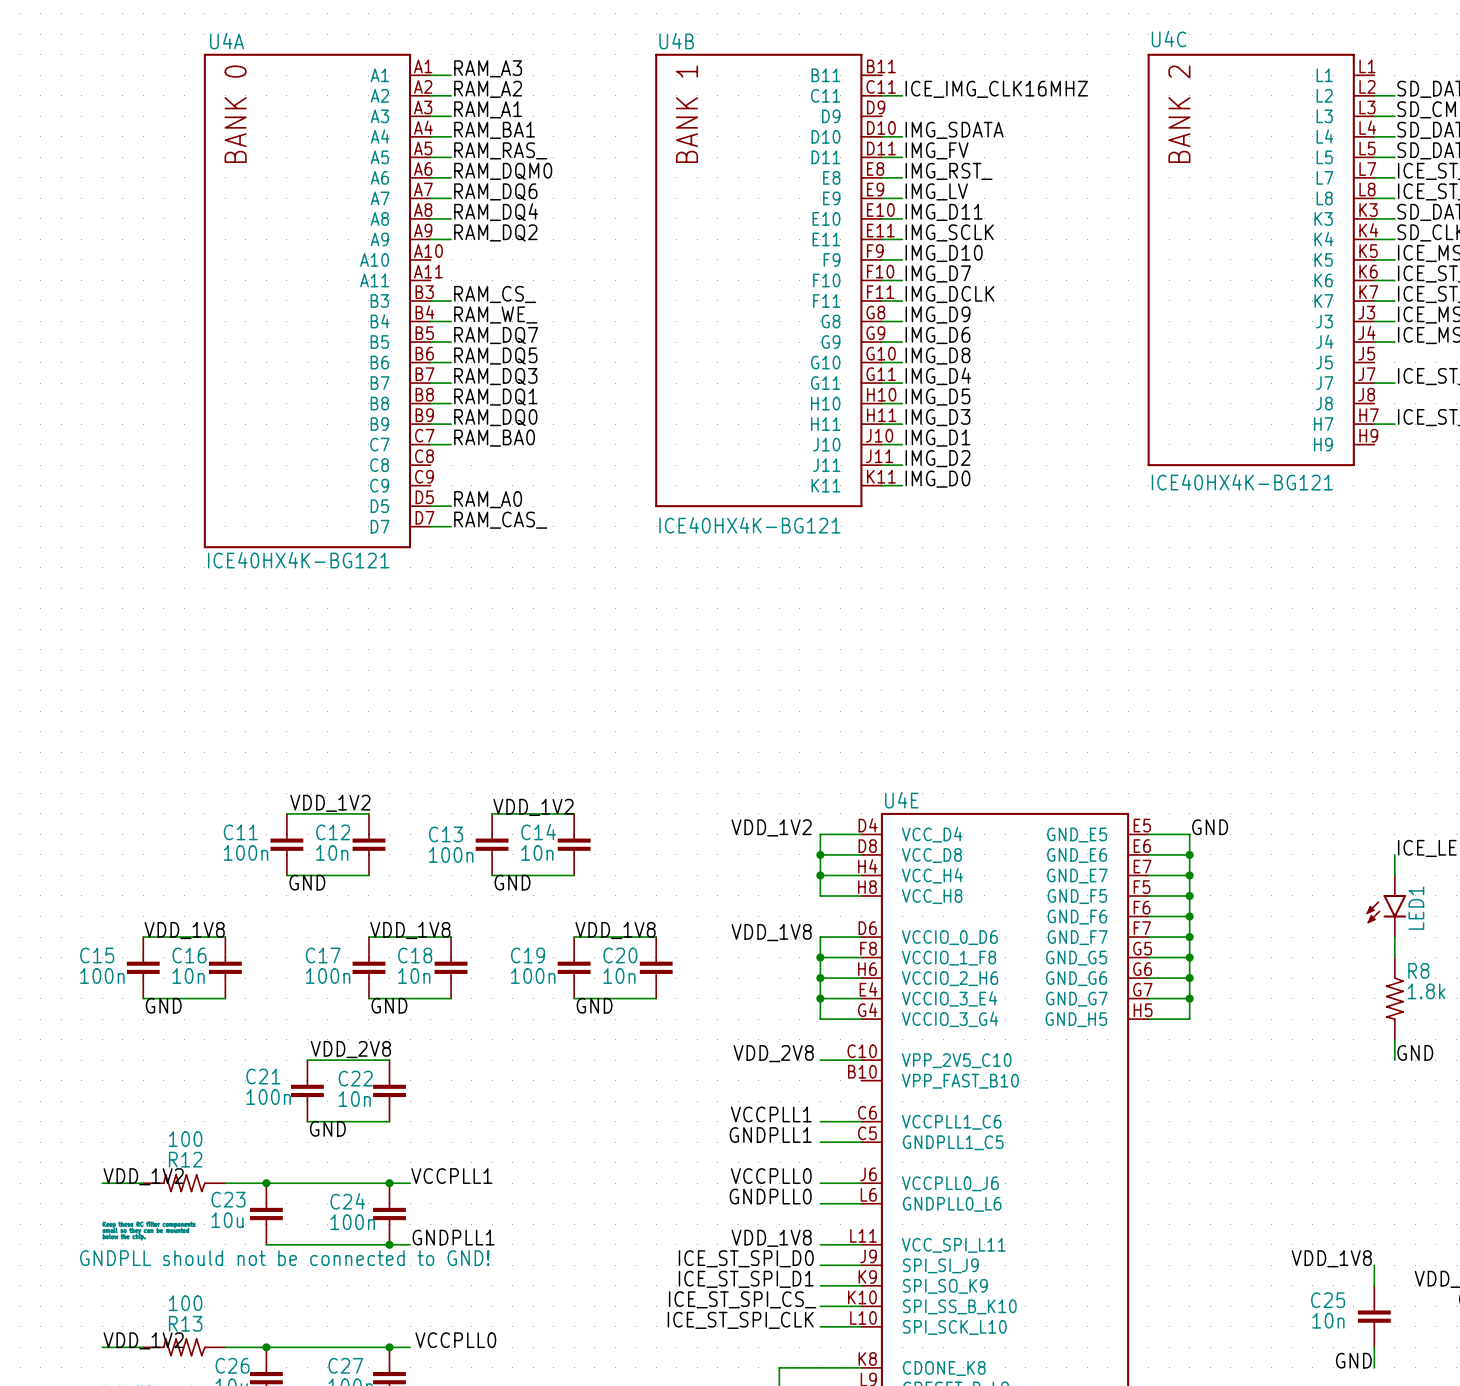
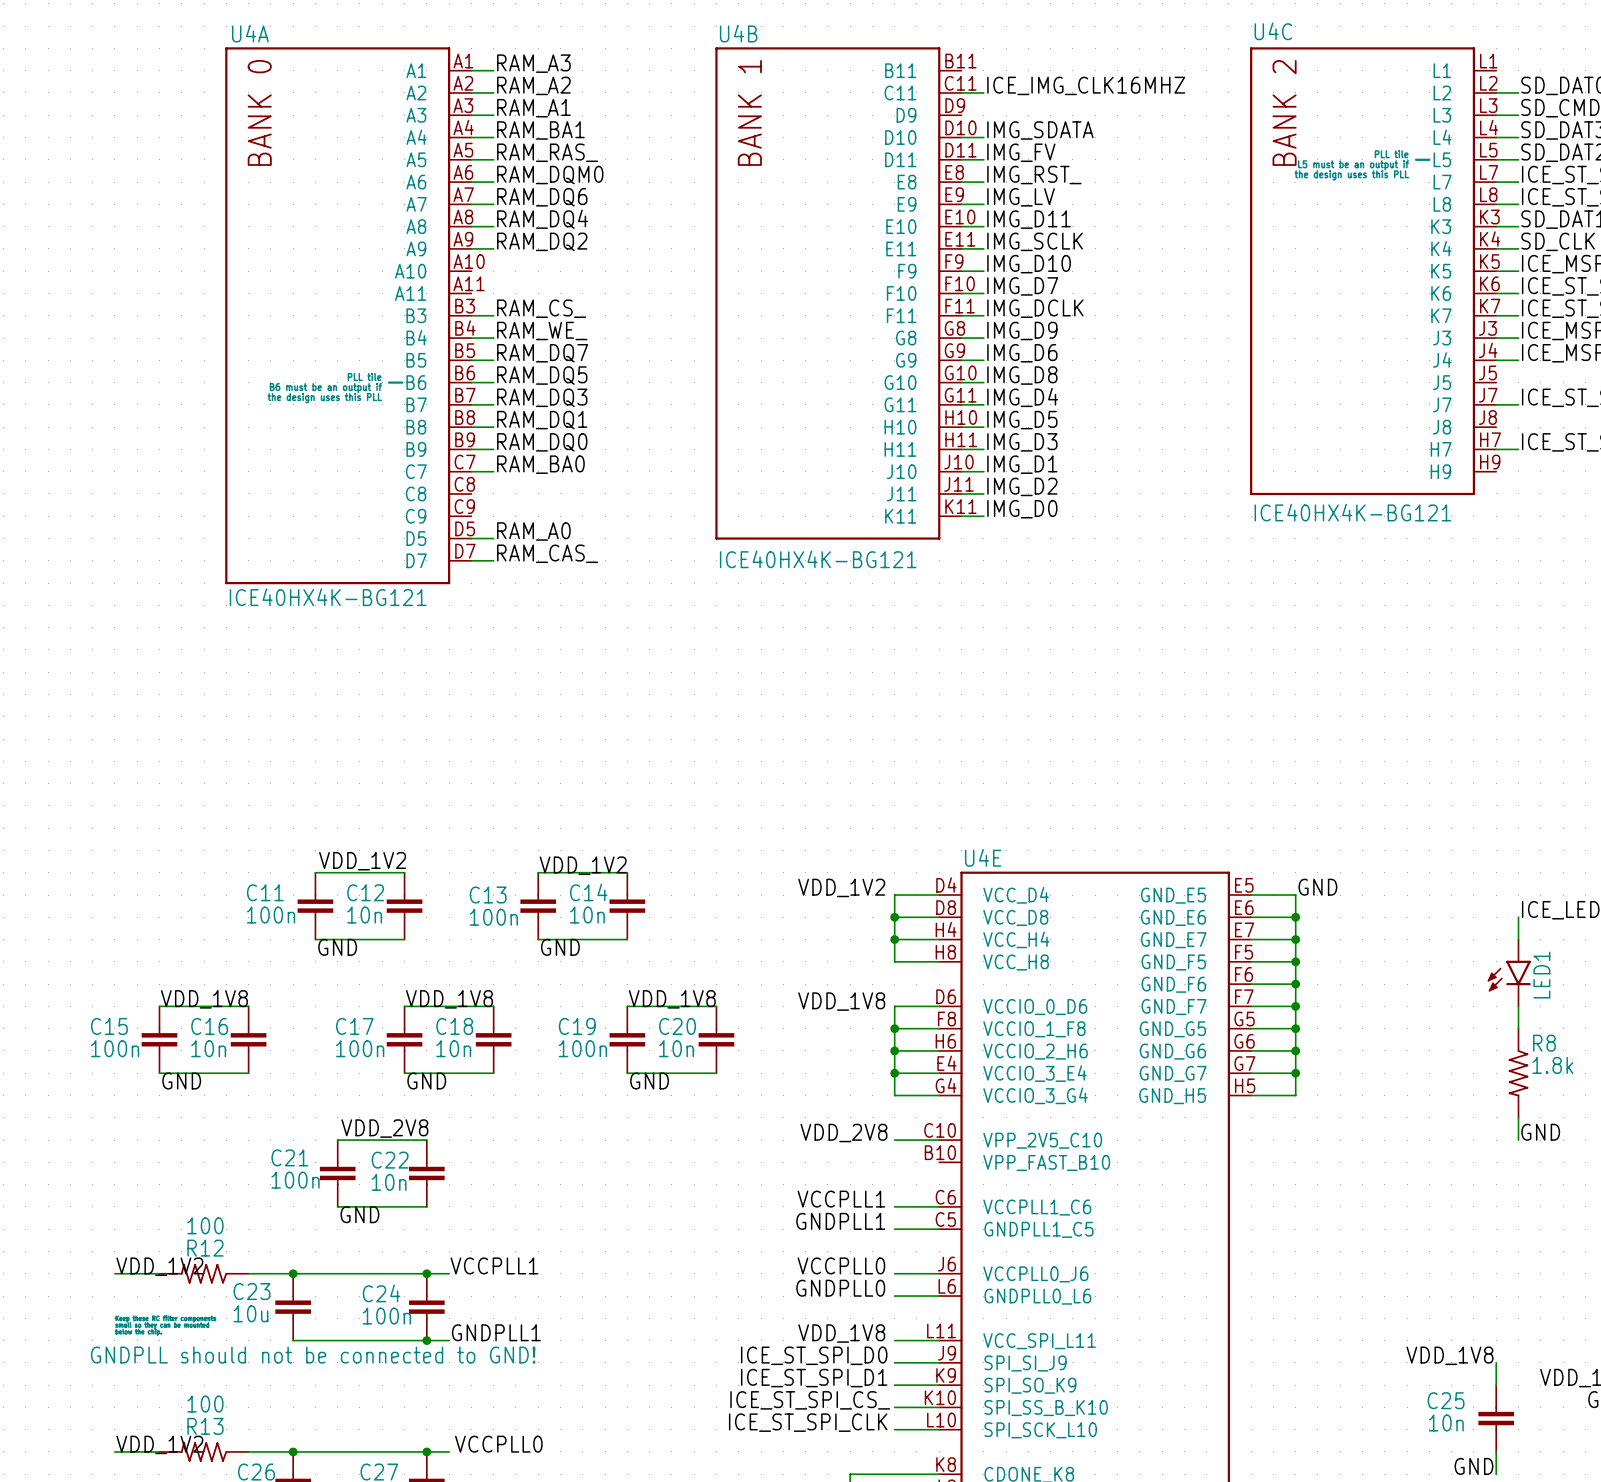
U4A symbol: [203, 53, 431, 549] -> [225, 47, 472, 585]
U4C symbol: [1147, 53, 1375, 467] -> [1250, 47, 1497, 496]

